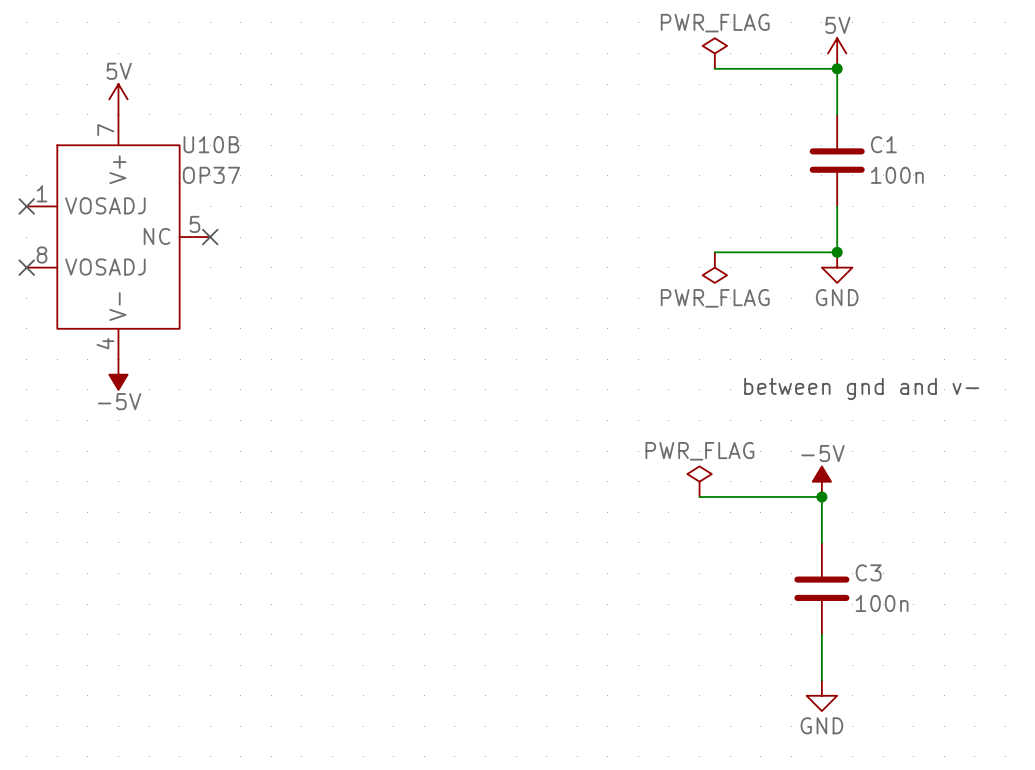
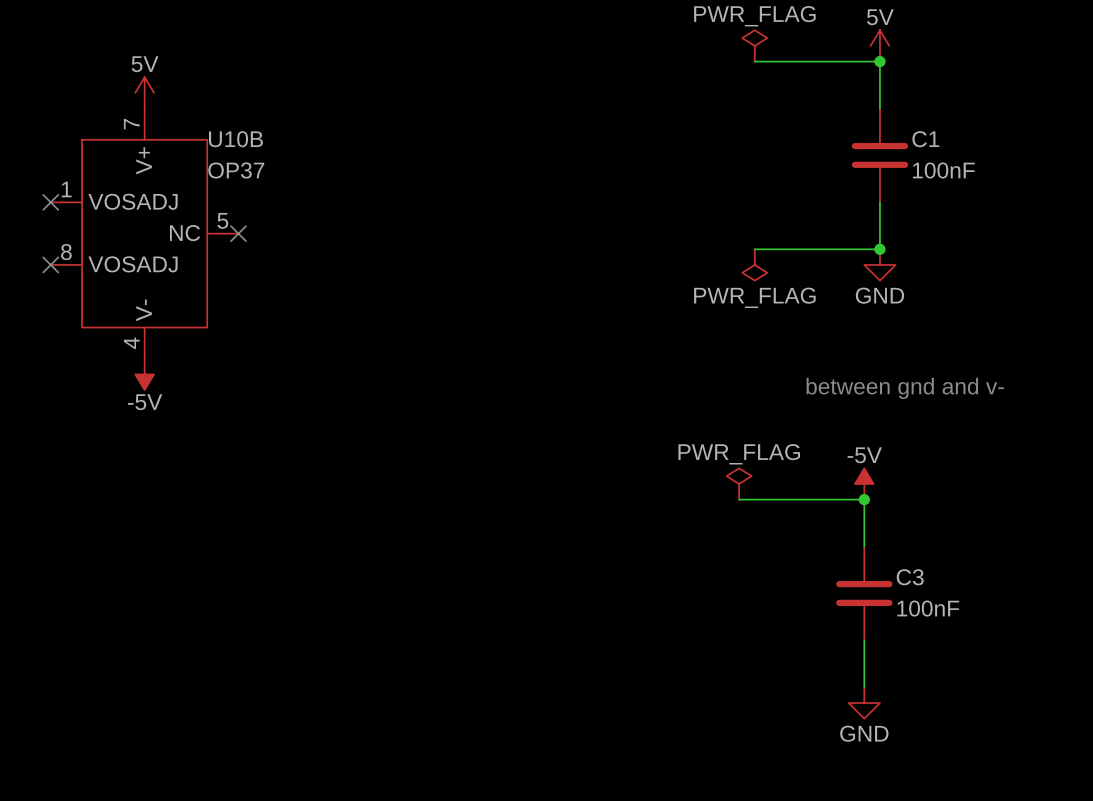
C1 value: 100n (897, 175) -> 100nF (943, 170)
C3 value: 100n (882, 603) -> 100nF (928, 608)

